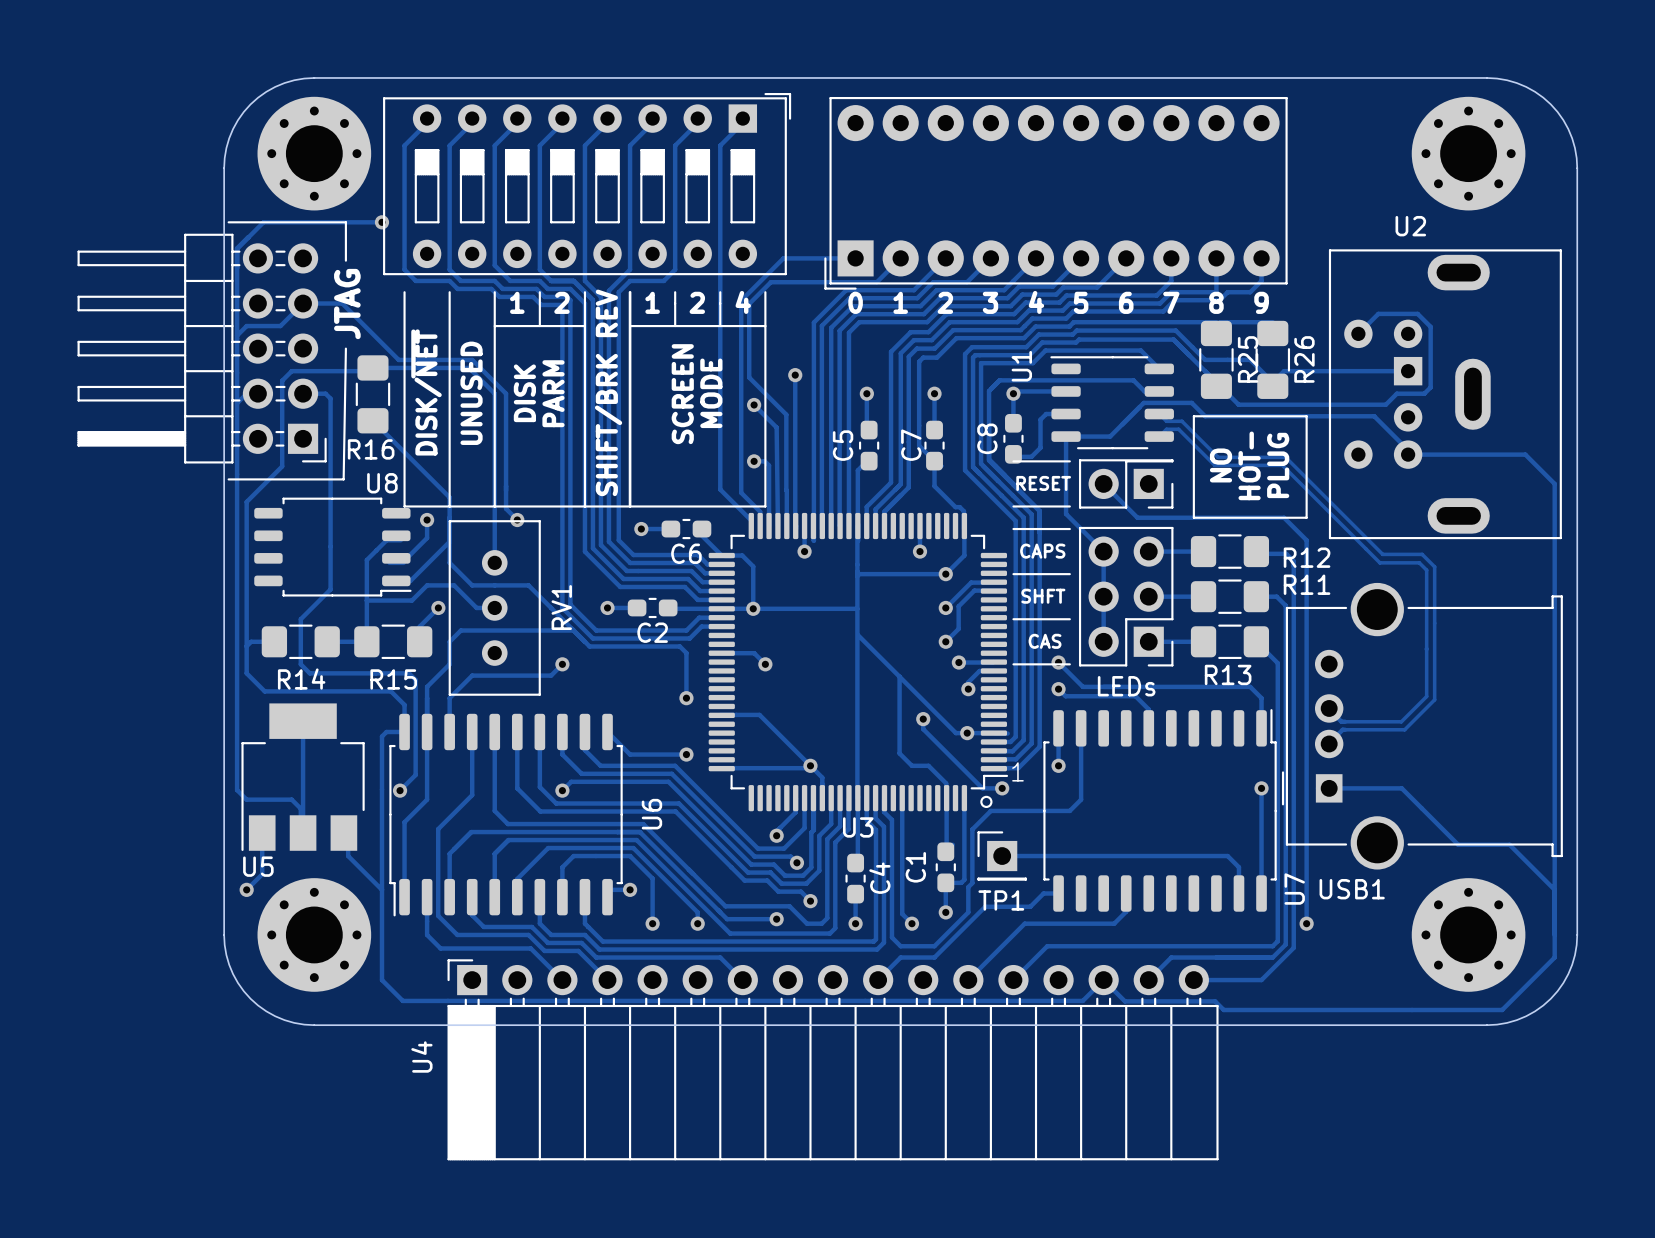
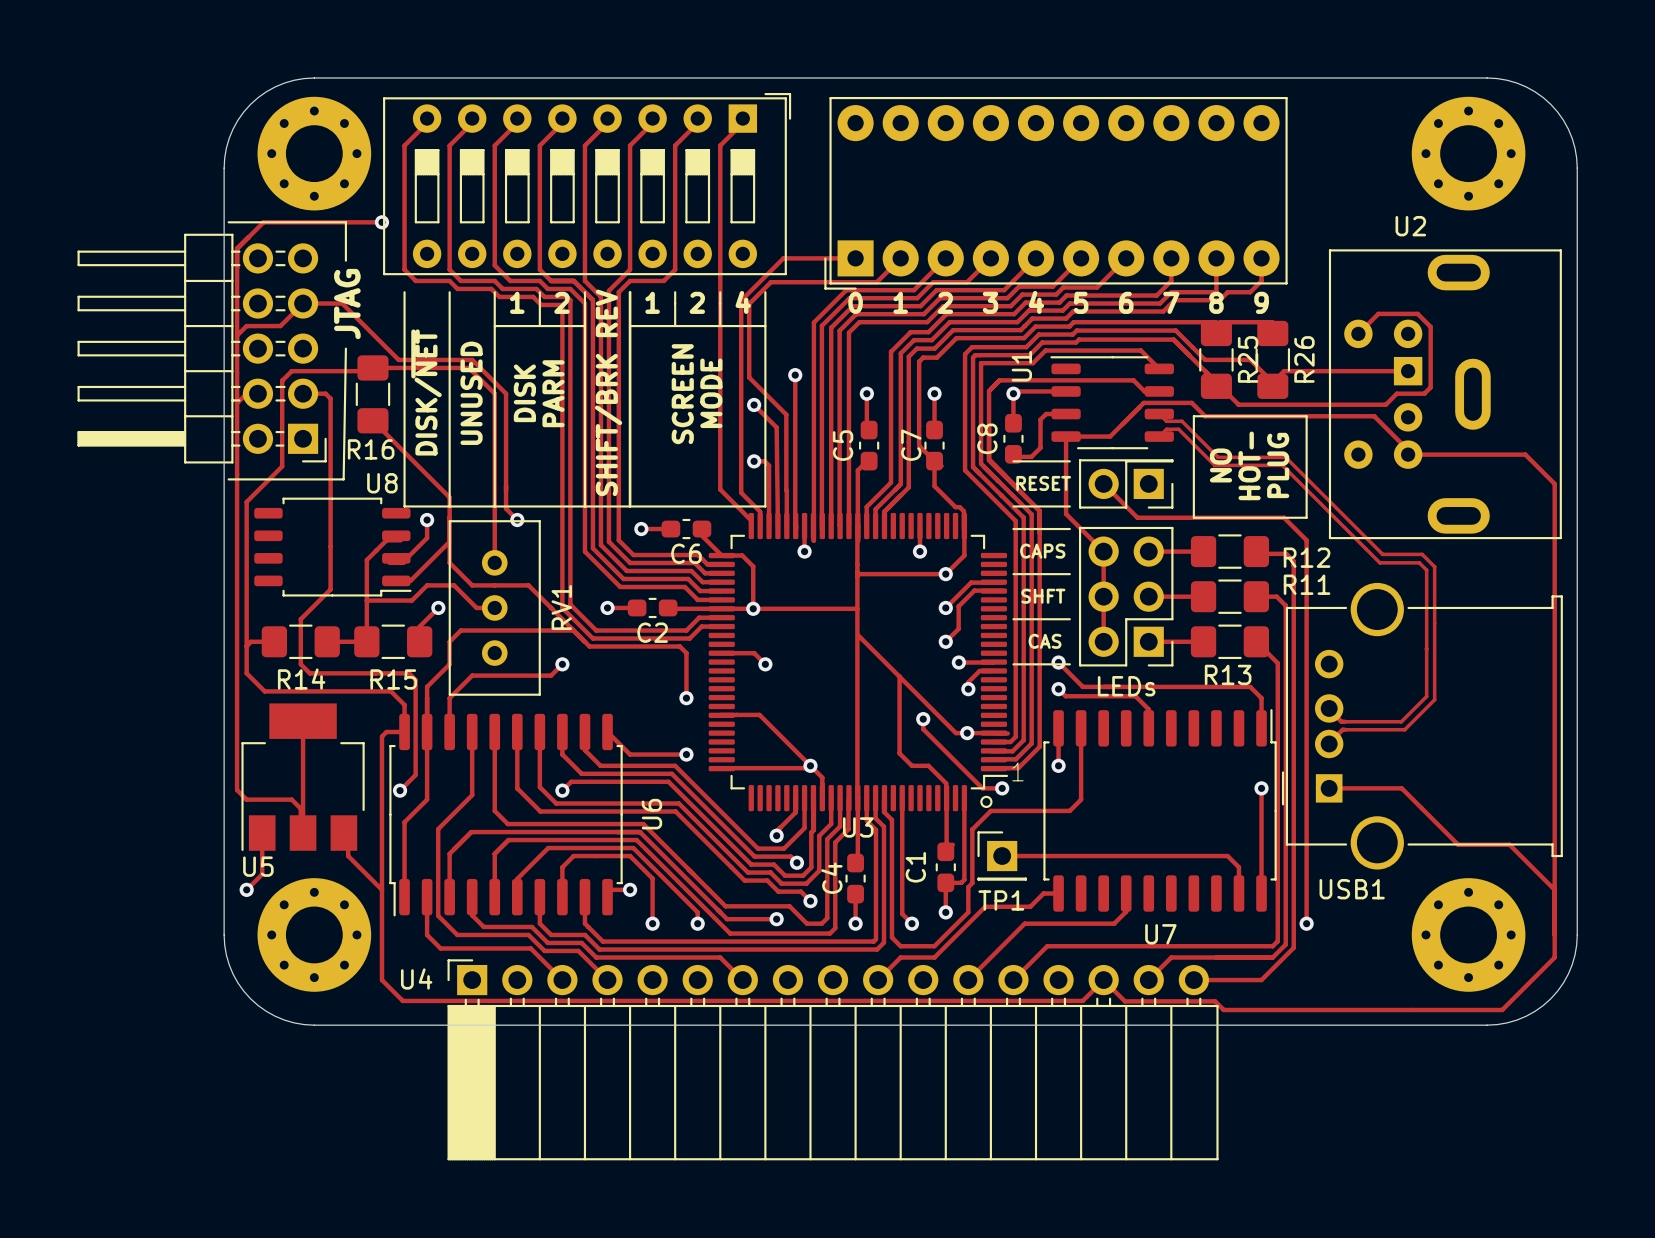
C4 name position: C4 (879, 878) -> C4 (831, 878)
U7 name rotation: 0° (1294, 889) -> 90° clockwise (1160, 934)
U7 name position: U7 (1294, 889) -> U7 (1160, 934)
U4 name rotation: 0° (421, 1057) -> 90° clockwise (416, 978)
U4 name position: U4 (421, 1057) -> U4 (416, 978)

